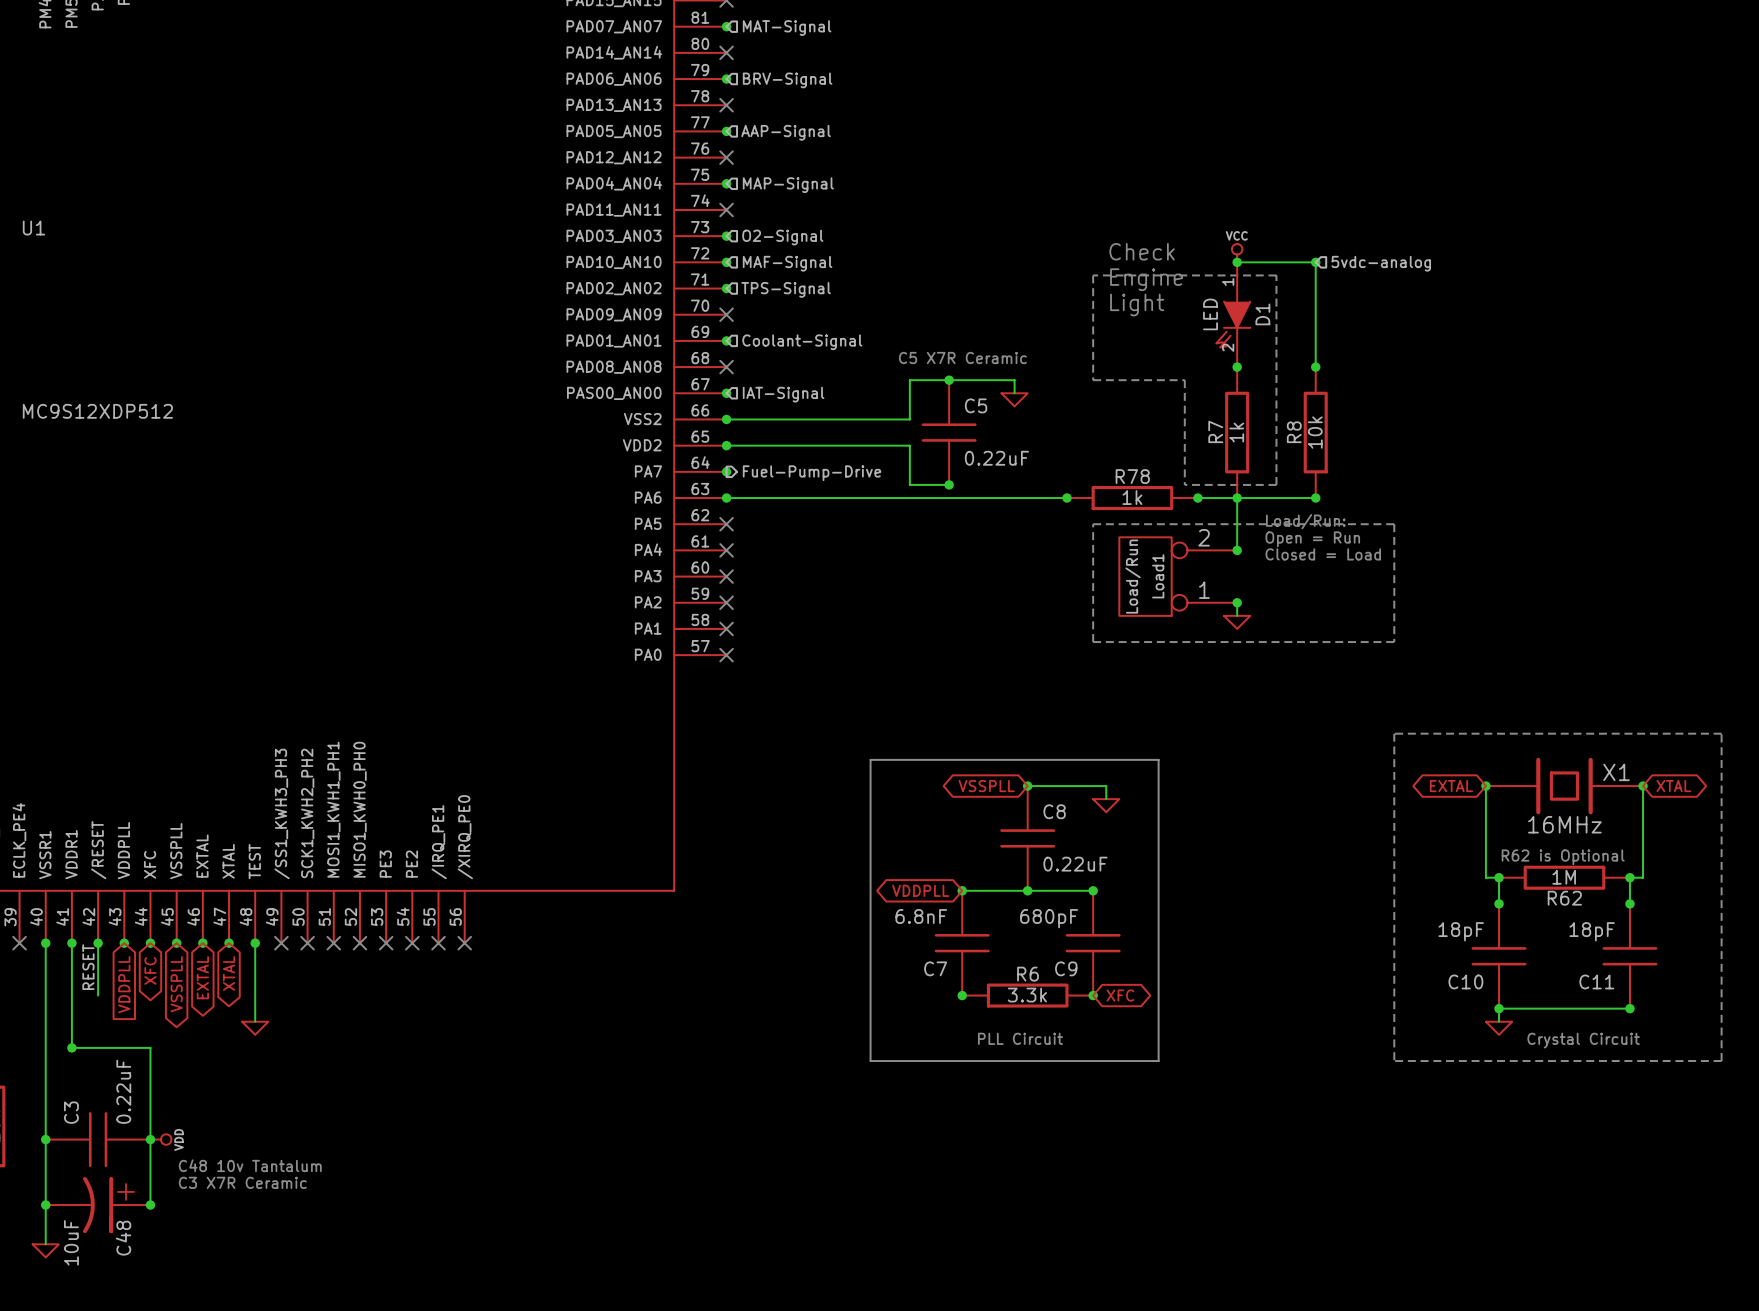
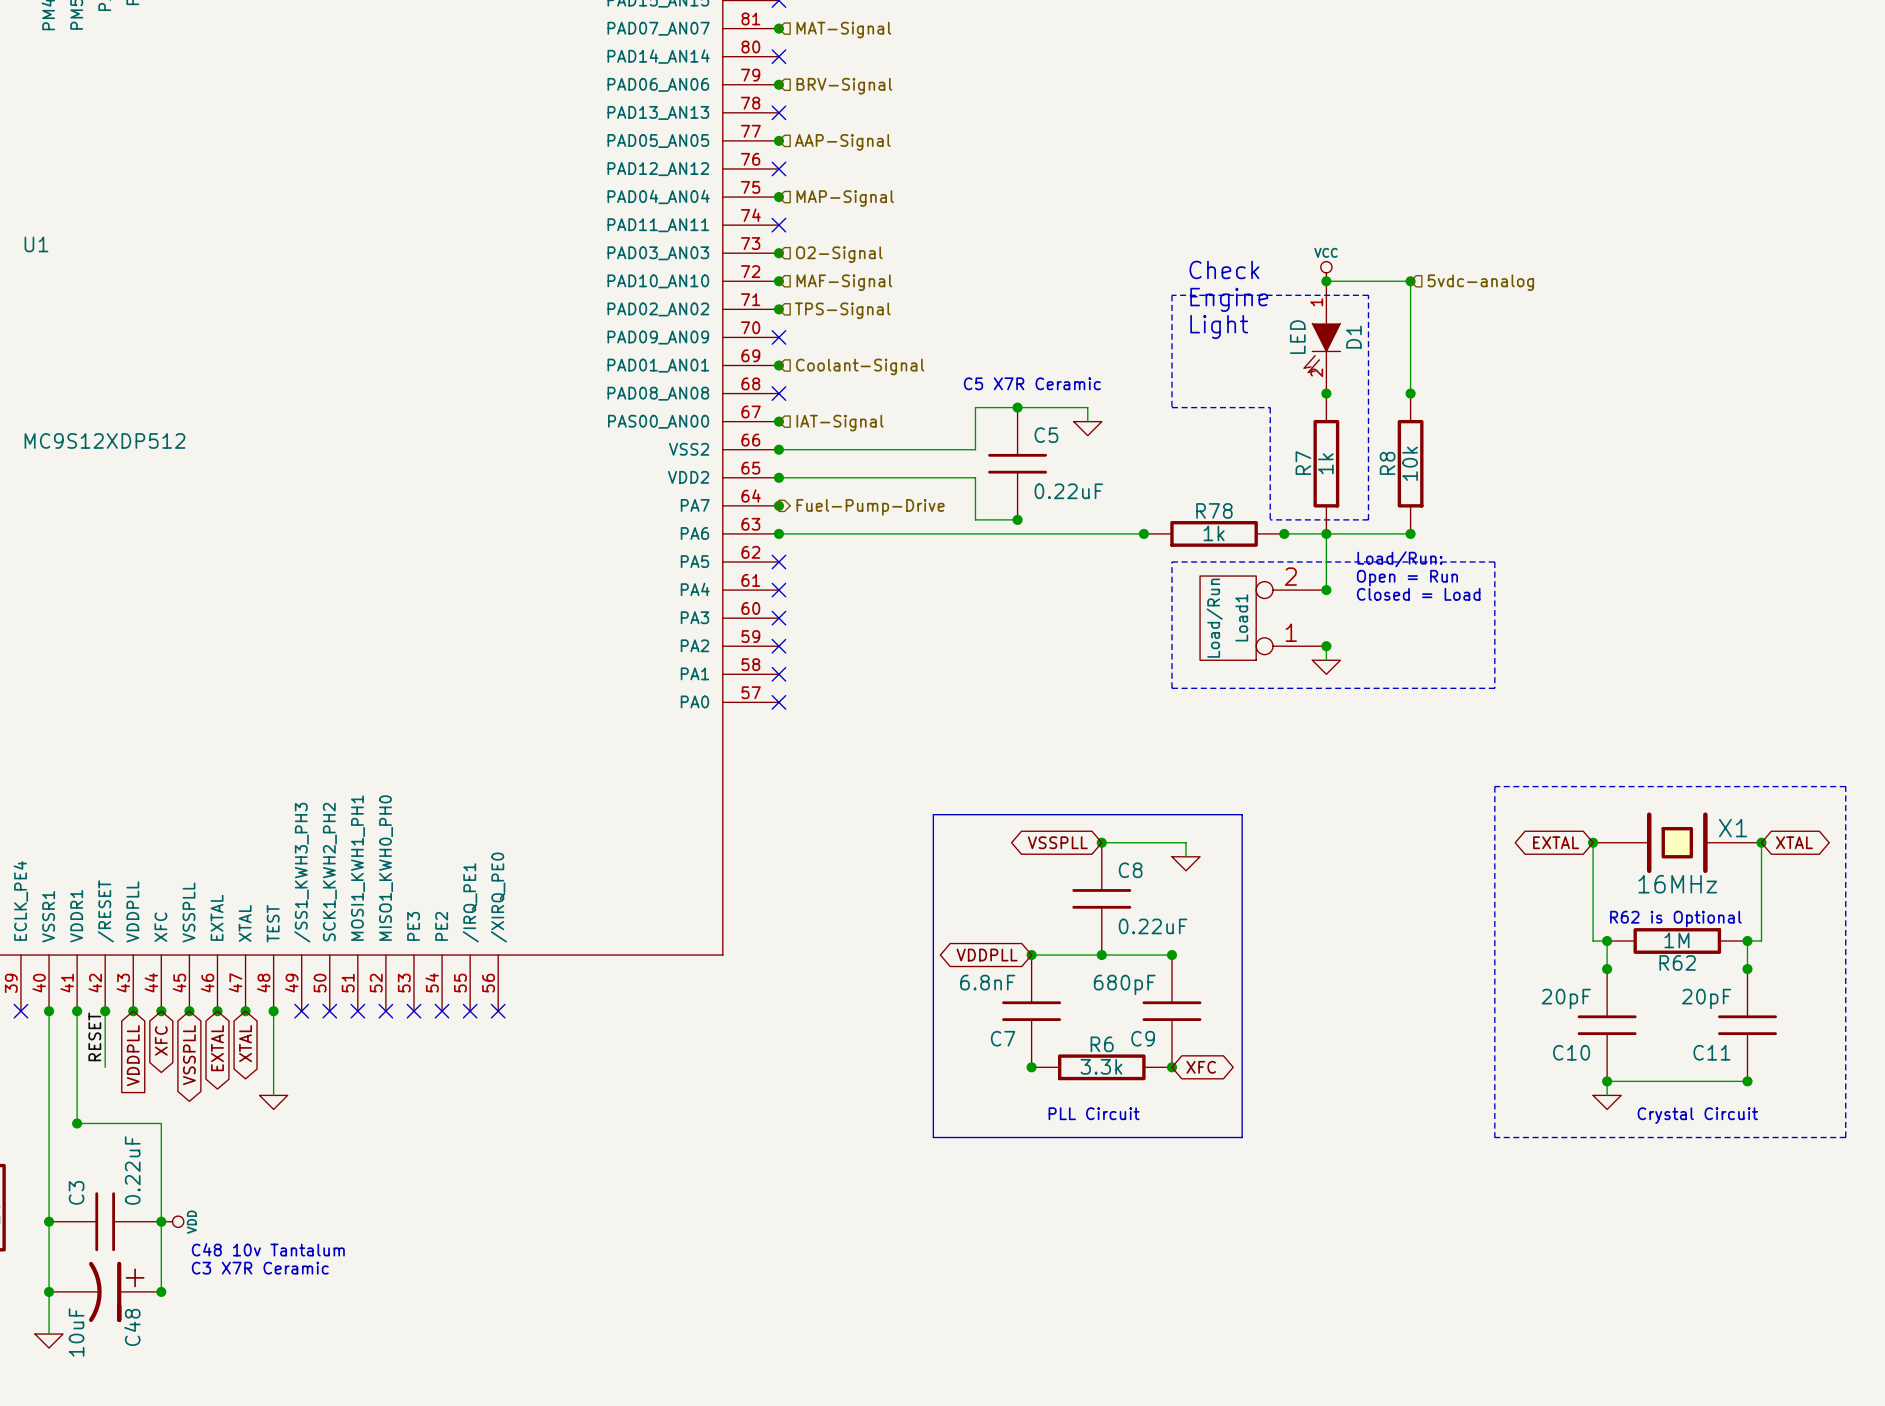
C10 value: 18pF (1461, 931) -> 20pF (1566, 998)
C11 value: 18pF (1592, 931) -> 20pF (1706, 998)

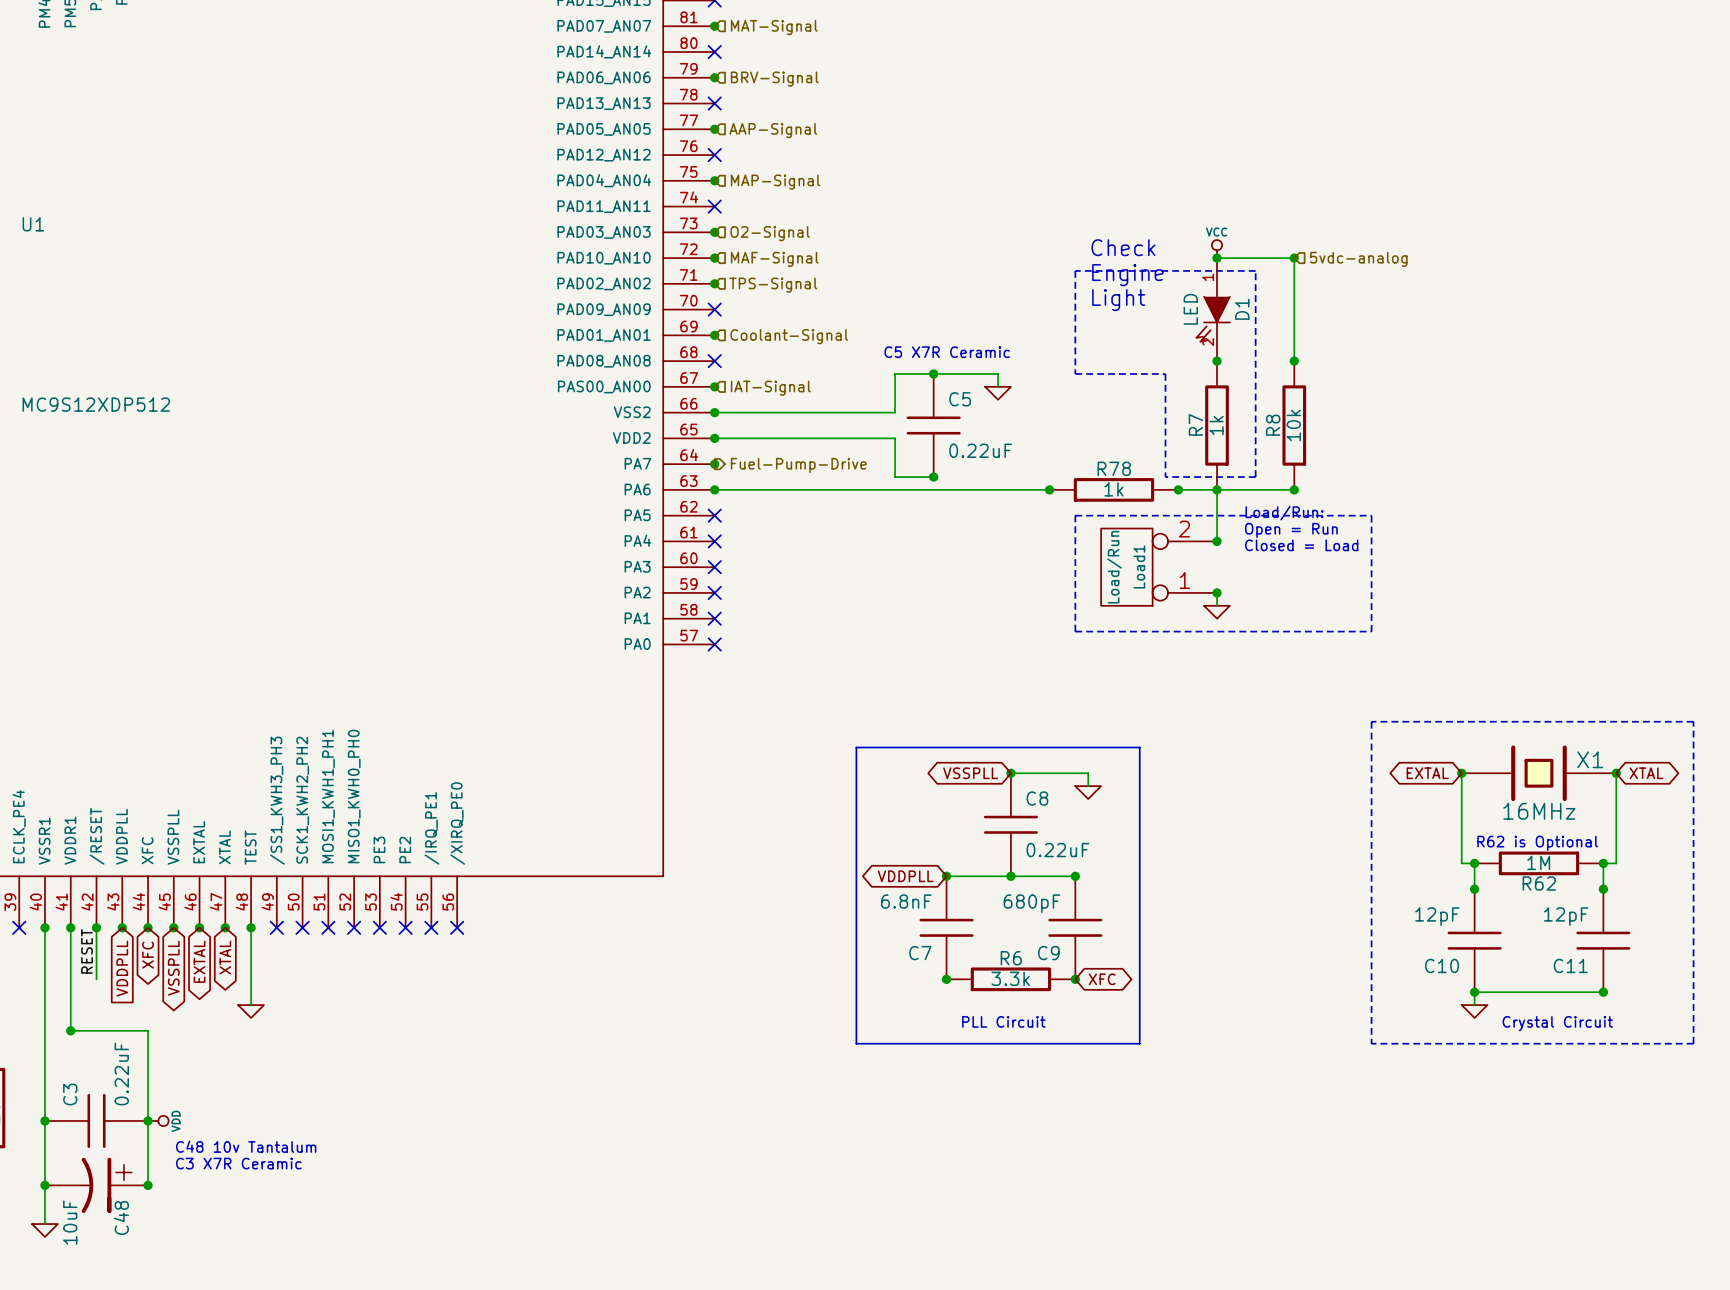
C10 value: 20pF (1566, 998) -> 12pF (1437, 916)
C11 value: 20pF (1706, 998) -> 12pF (1566, 916)

